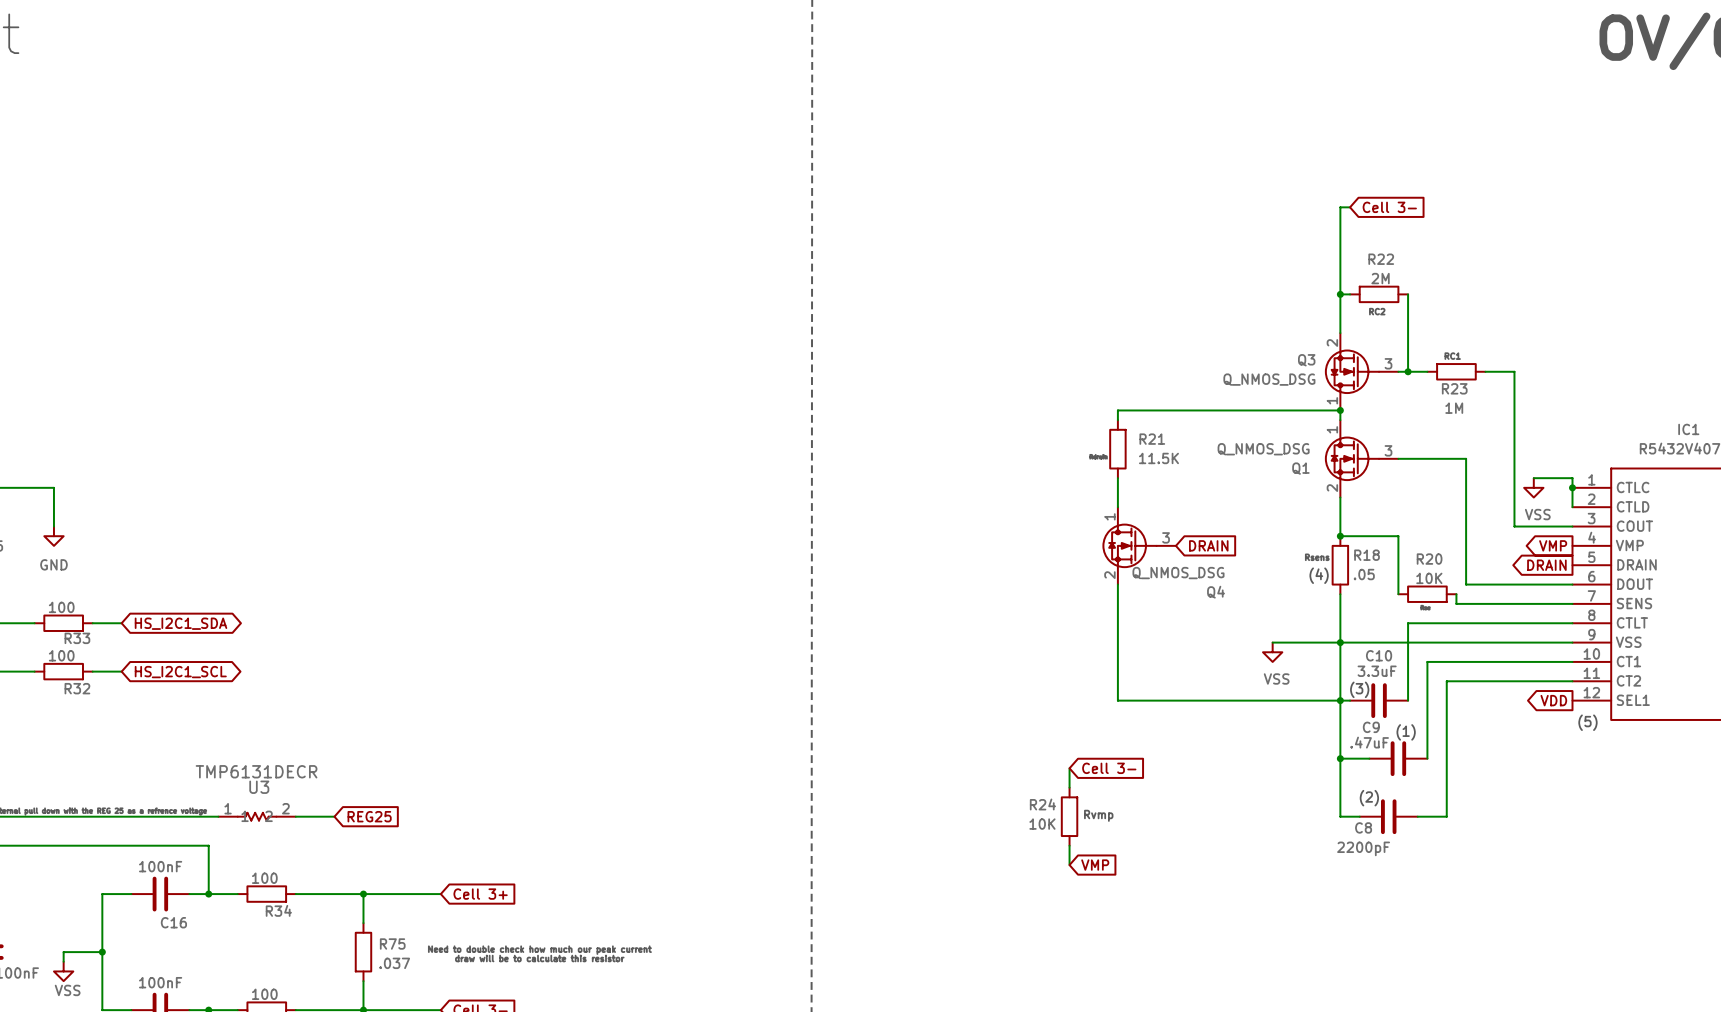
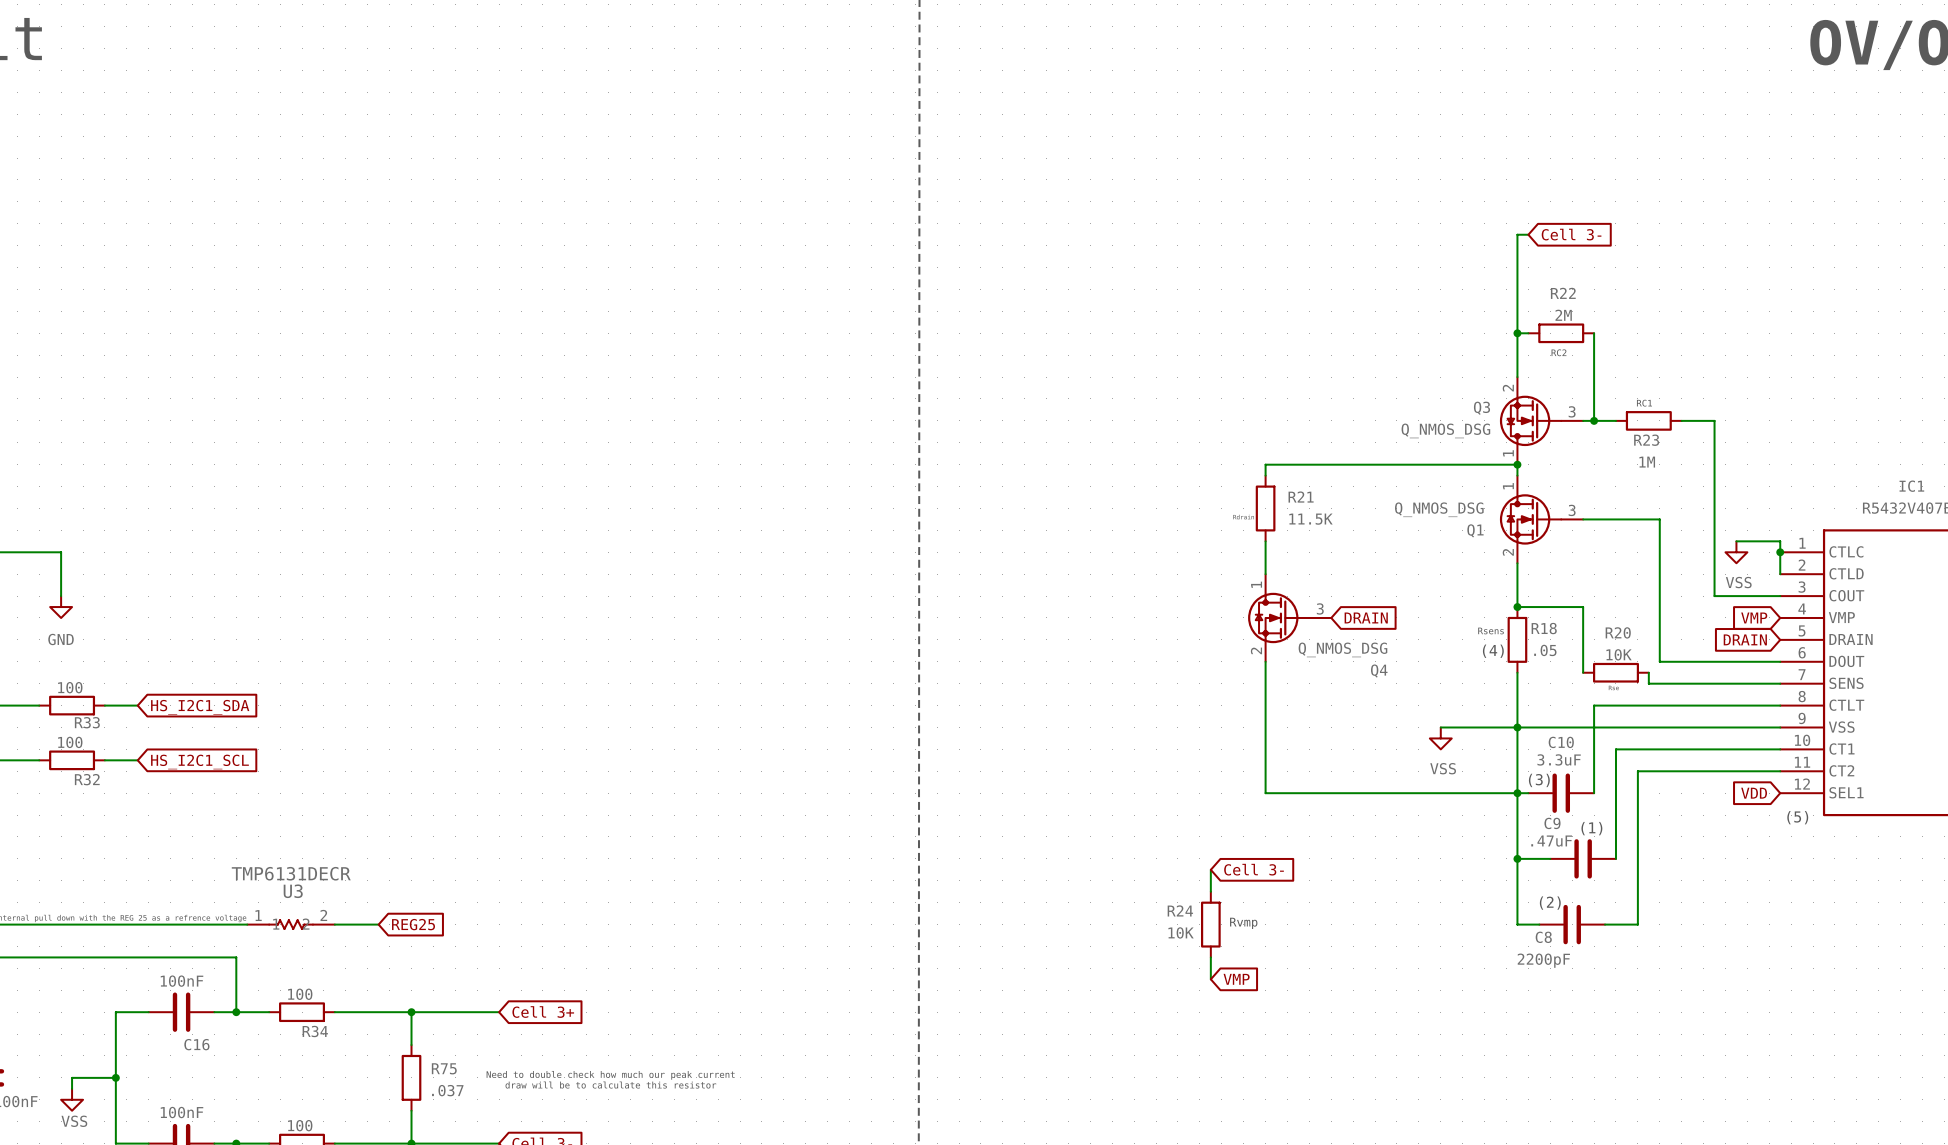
global label shape: output (1553, 545) -> input (1754, 617)
global label shape: output (1546, 565) -> input (1745, 639)
global label shape: bidirectional (180, 623) -> input (200, 707)
global label shape: bidirectional (180, 672) -> input (199, 762)
global label shape: output (1553, 700) -> input (1754, 793)

